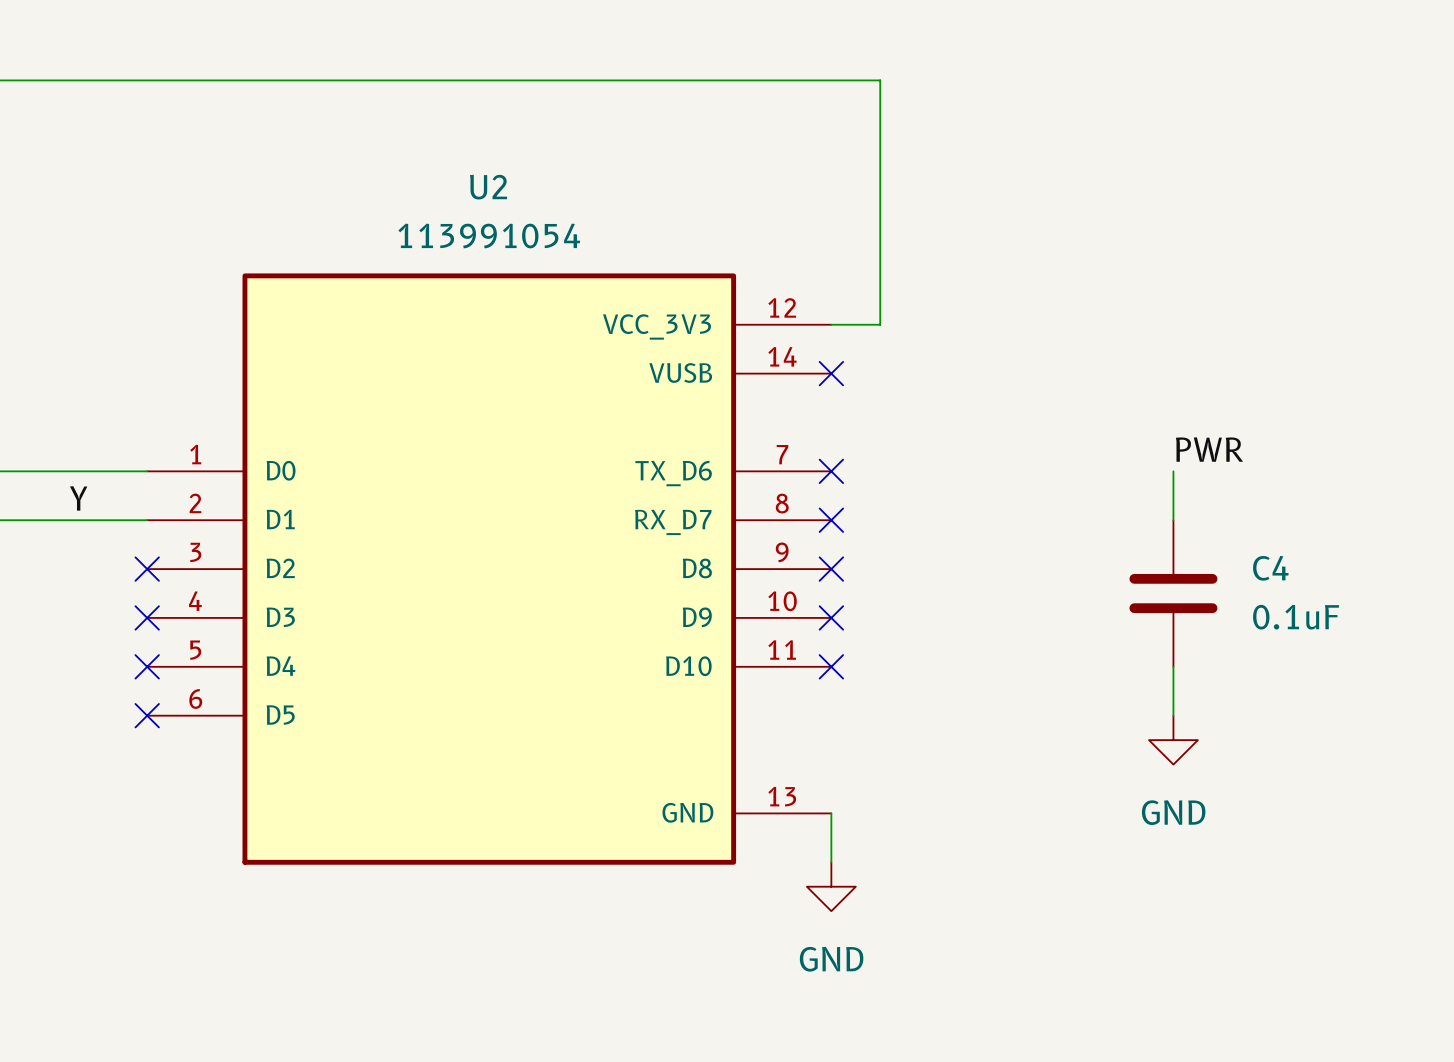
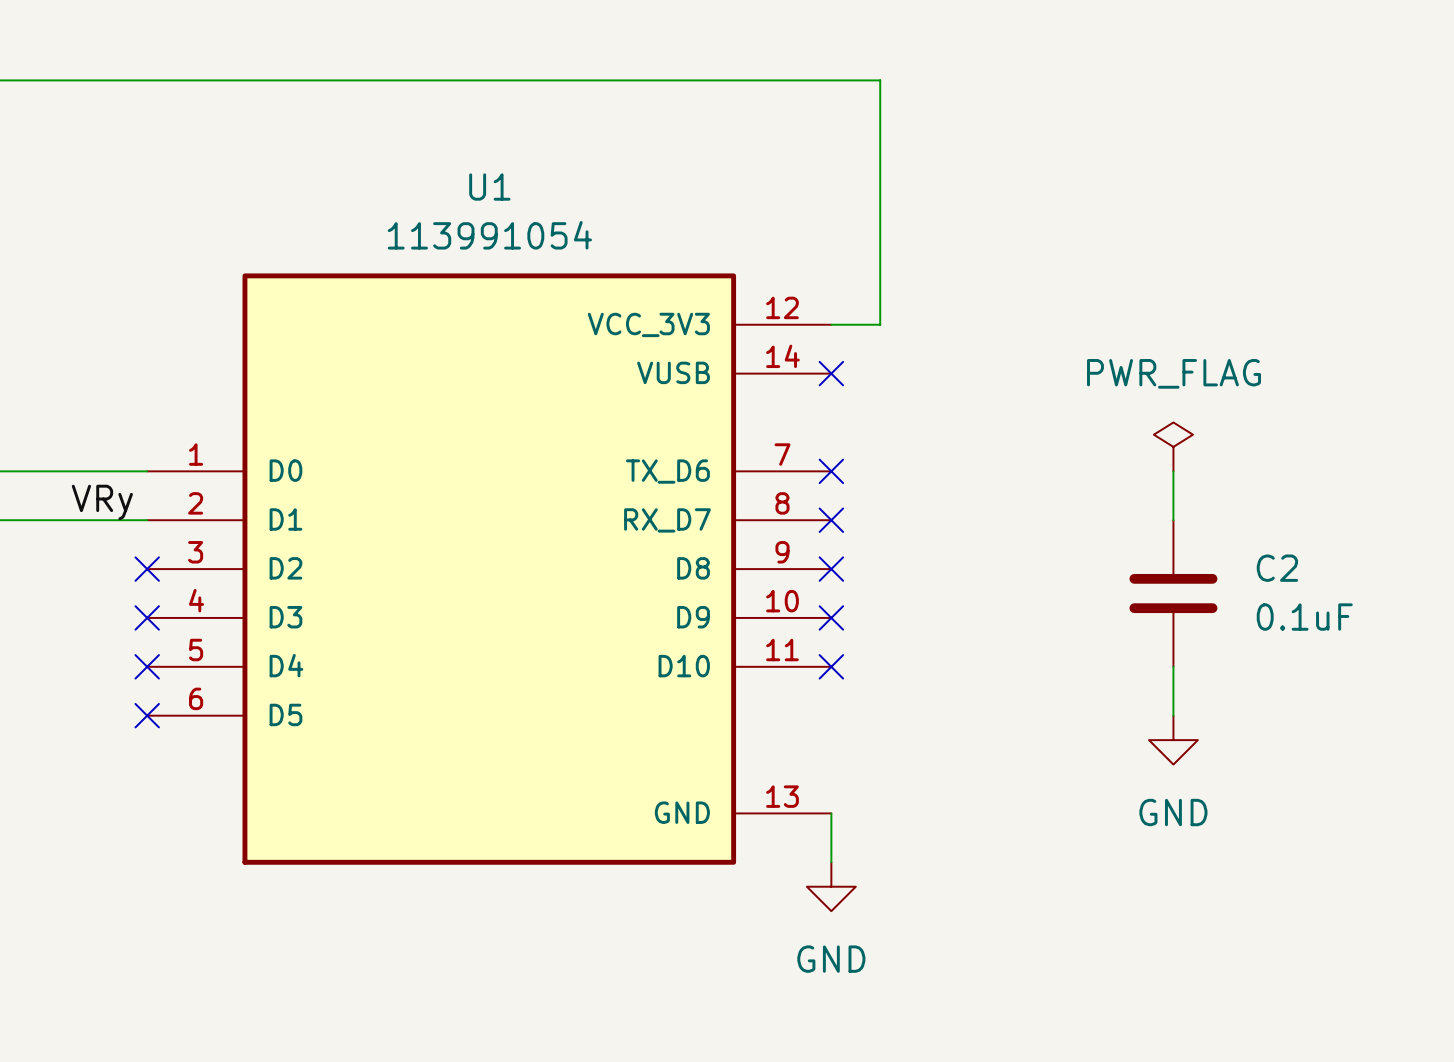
U2 name: U2 (488, 187) -> U1 (489, 187)
power symbol: none -> PWR_FLAG (1173, 446)
label: PWR (1209, 449) -> none
label: Y (78, 498) -> VRy (102, 502)
C4 name: C4 (1270, 568) -> C2 (1277, 568)

